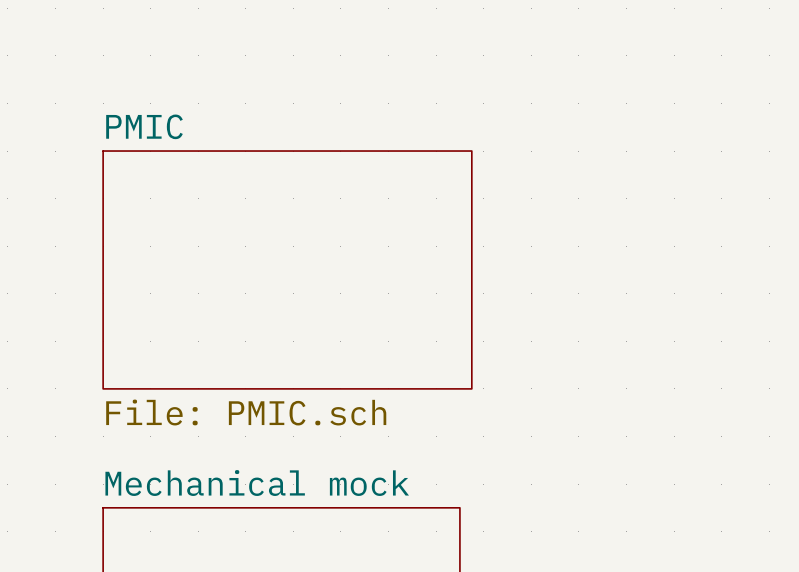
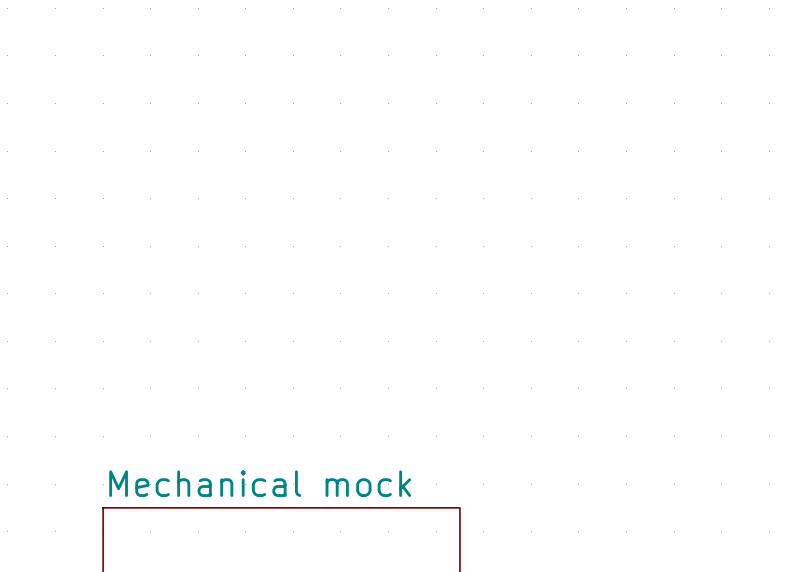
sheet PMIC: File: PMIC.sch (287, 269) -> none

